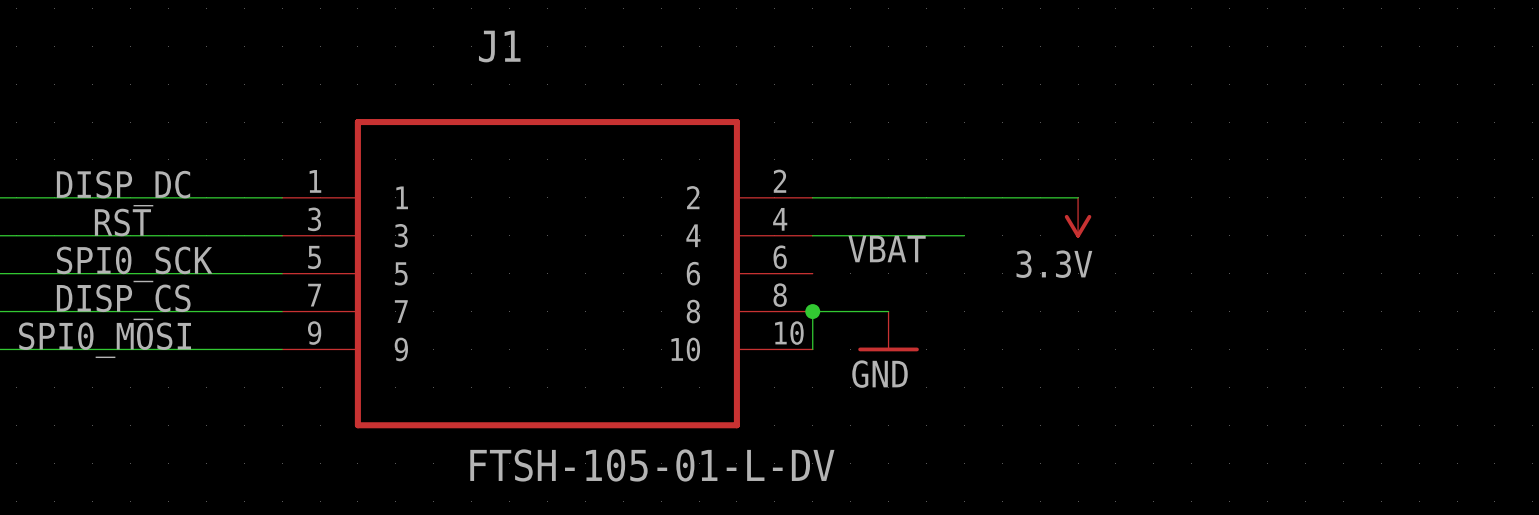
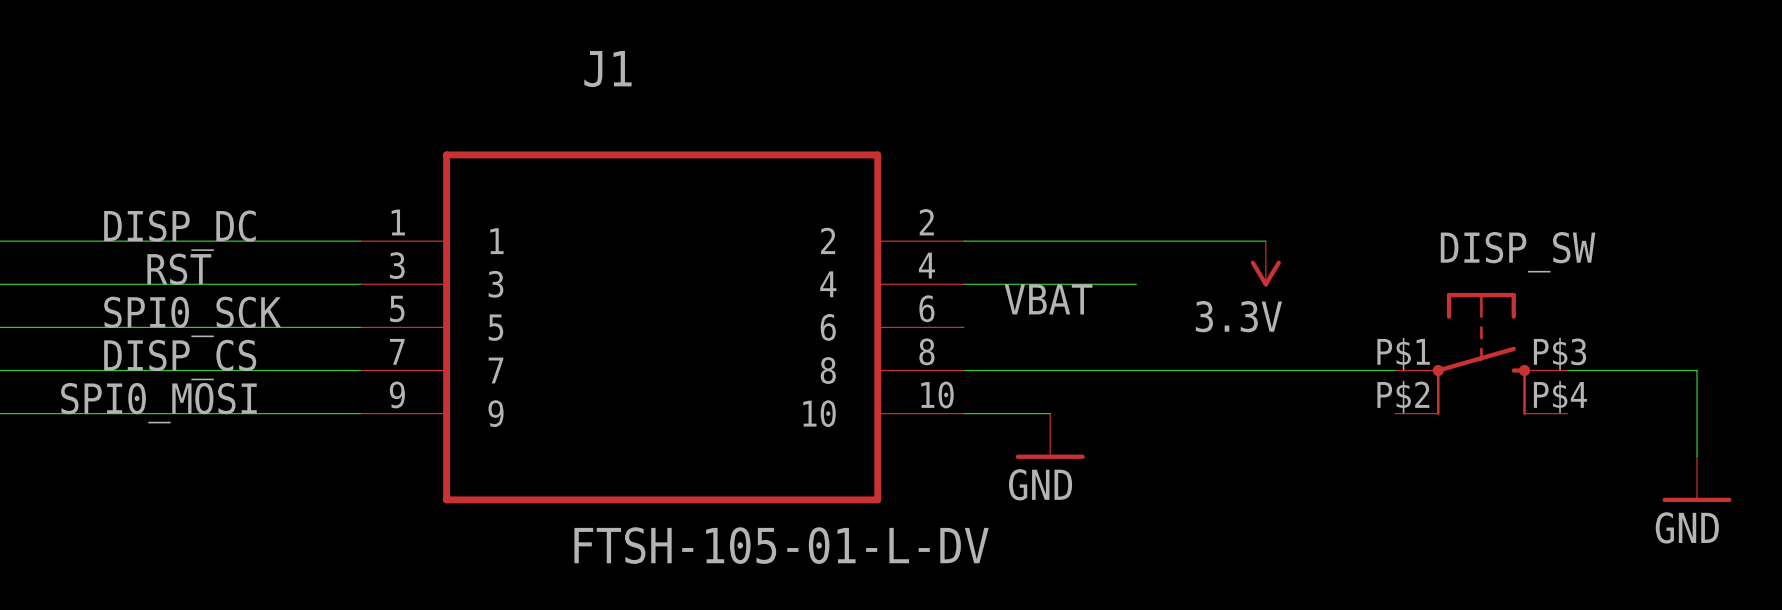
DISP_SW: none -> (1481, 353)
wire: (812, 311) (812, 349) -> (1050, 413) (964, 413)
junction: (812, 311) -> none
wire: none -> (1050, 370) (1395, 370)
wire: none -> (1567, 370) (1696, 370) (1696, 456)
power symbol position: GND (888, 331) -> GND (1050, 436)
power symbol: none -> GND (1696, 479)

